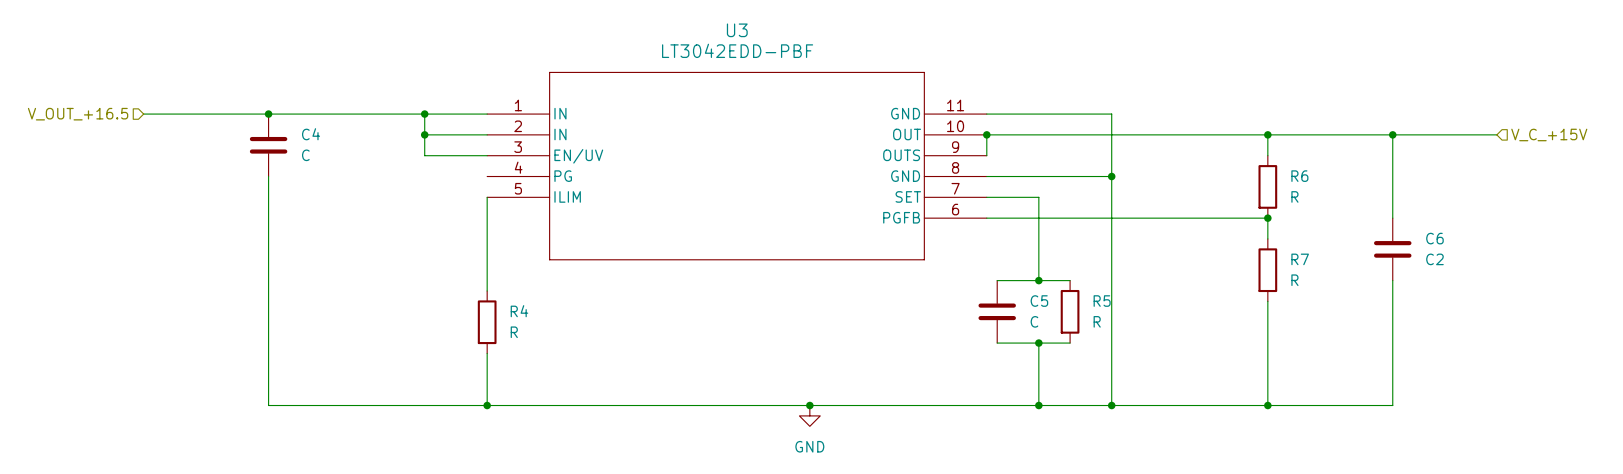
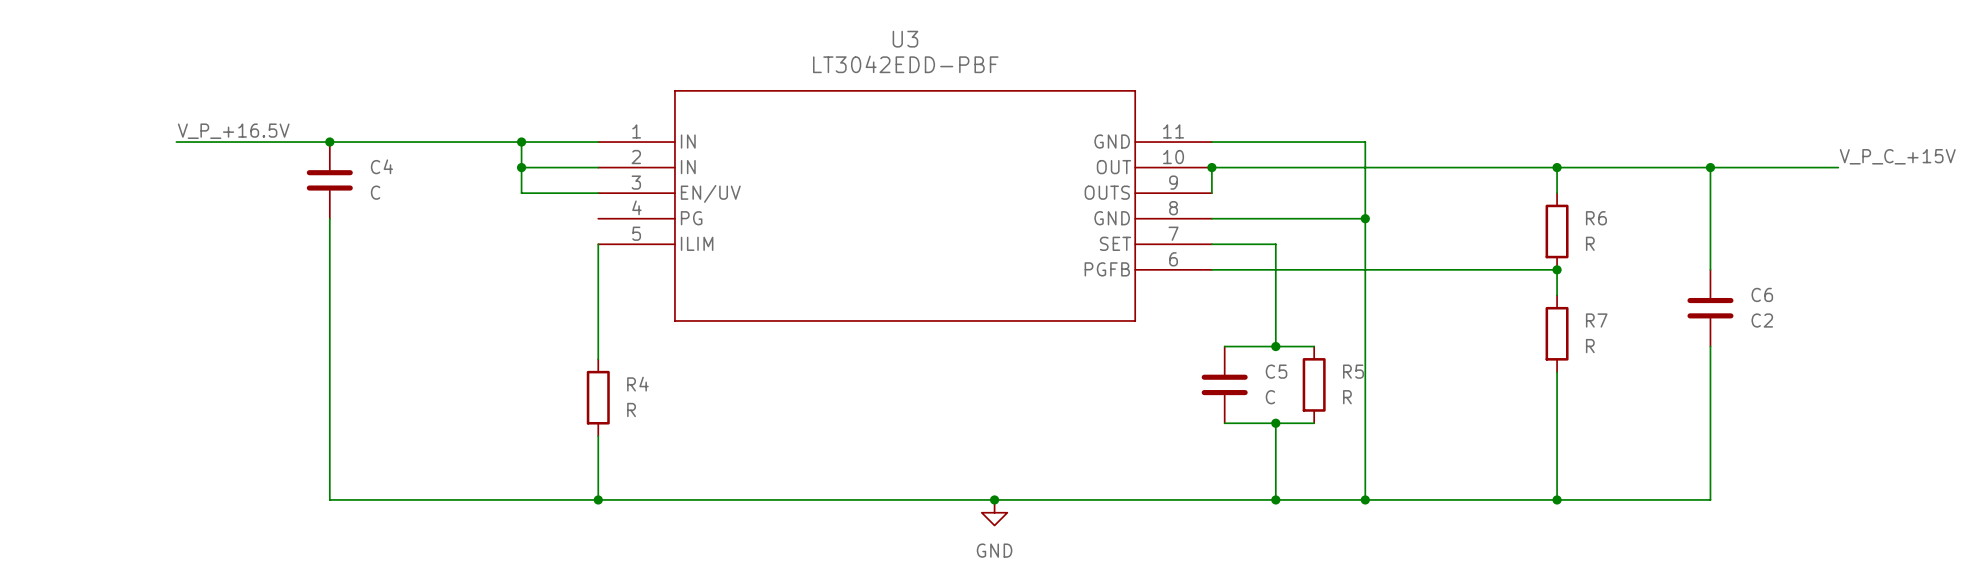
label: none -> V_P_+16.5V (233, 131)
hierarchical label: V_OUT_+16.5 (78, 114) -> none
label: none -> V_P_C_+15V (1897, 156)
hierarchical label: V_C_+15V (1549, 134) -> none

